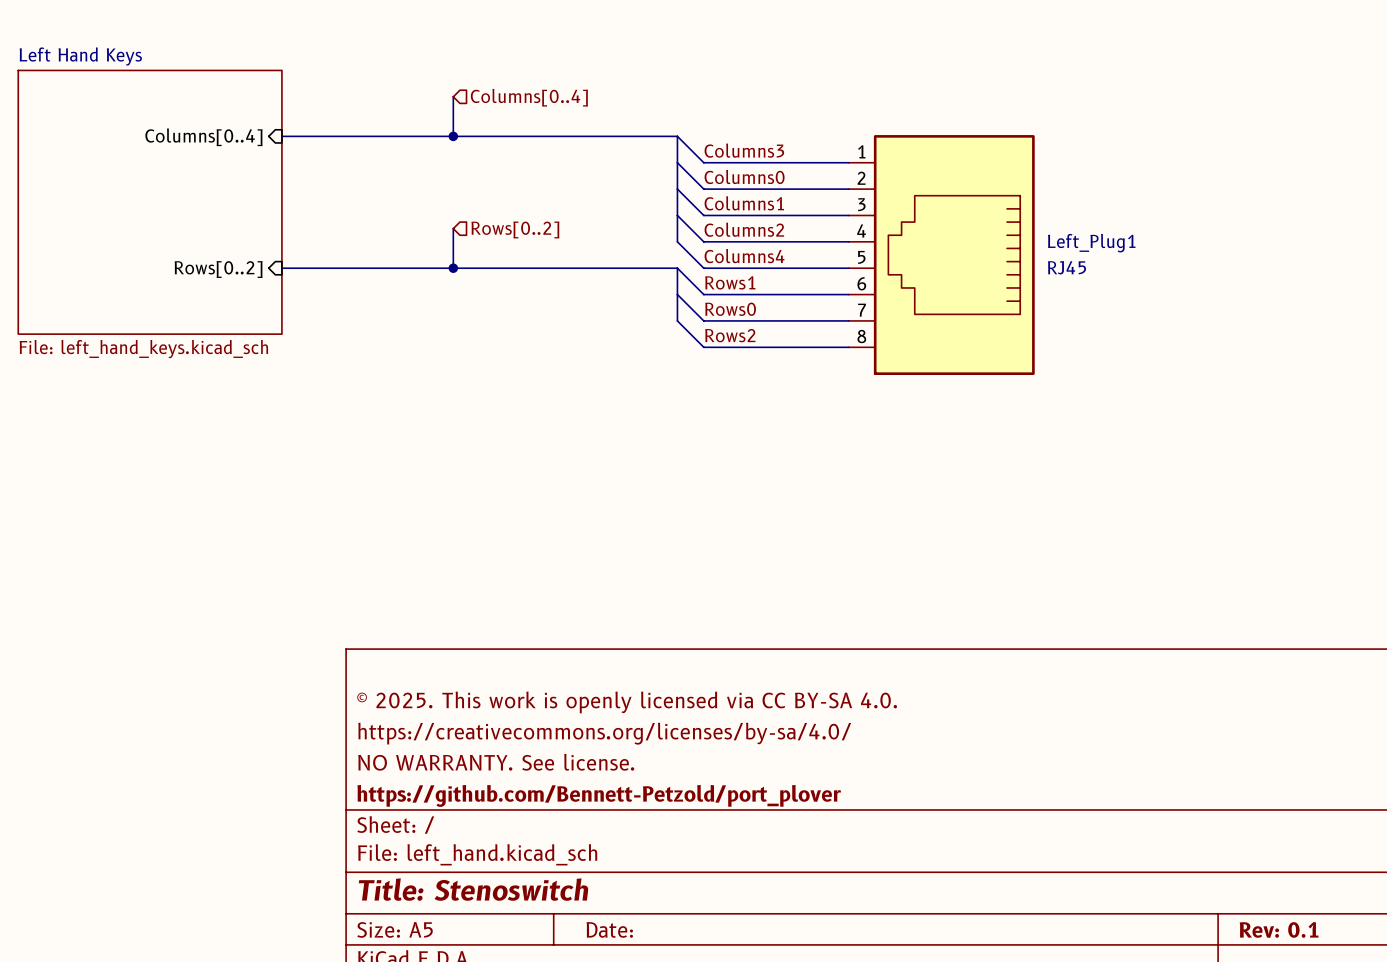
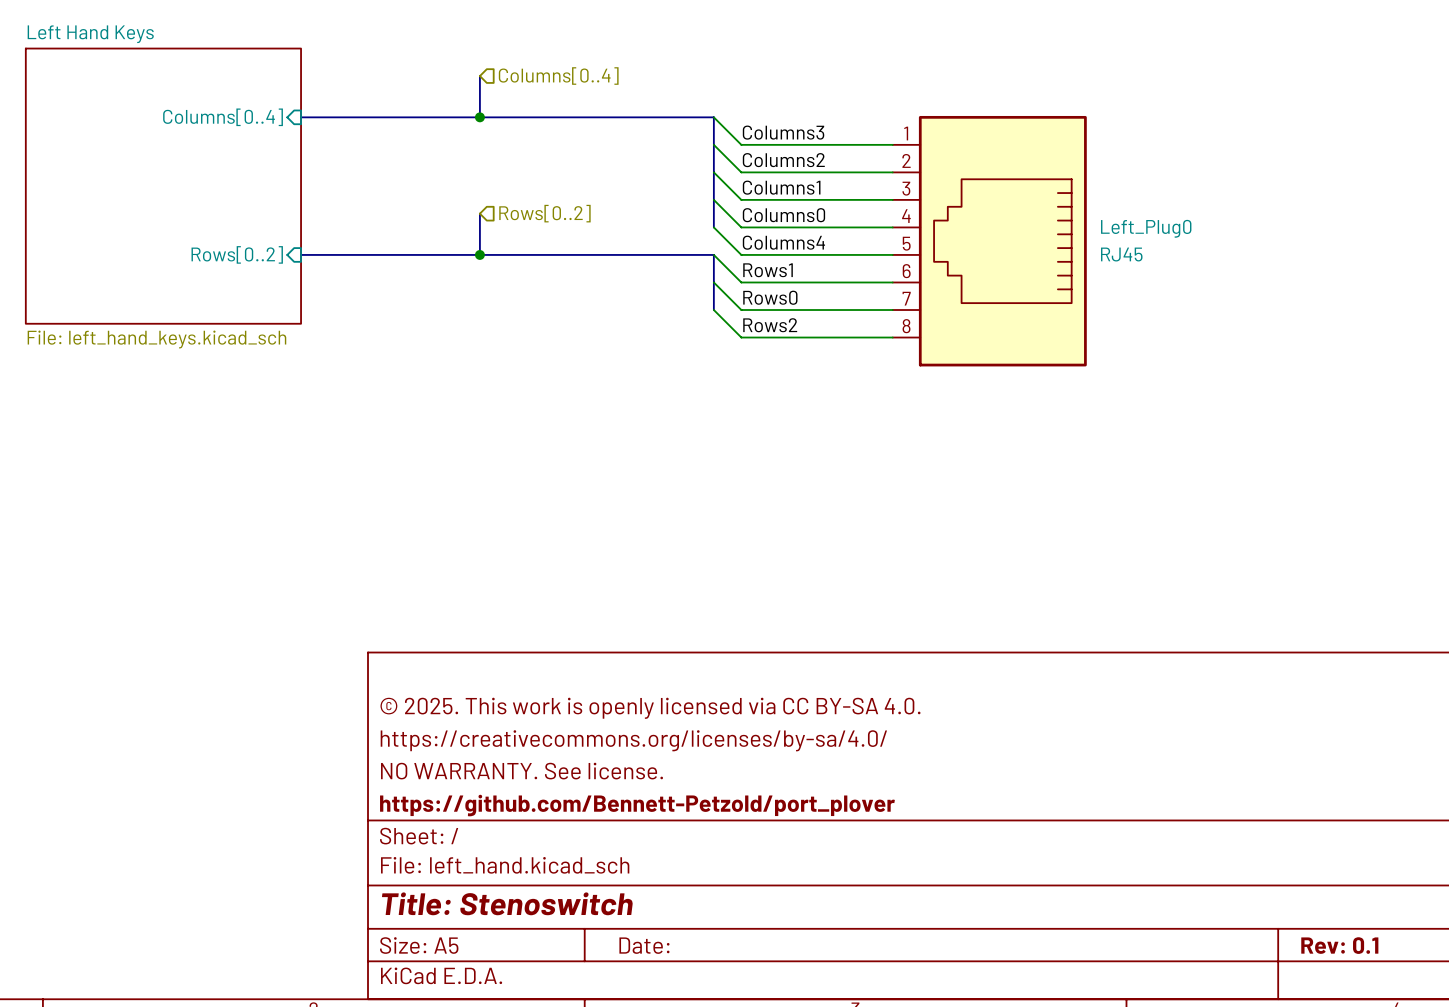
label: Columns0 (744, 176) -> Columns2 (783, 160)
label: Columns2 (744, 229) -> Columns0 (783, 215)
Left_Plug1 name: Left_Plug1 (1091, 243) -> Left_Plug0 (1146, 228)

